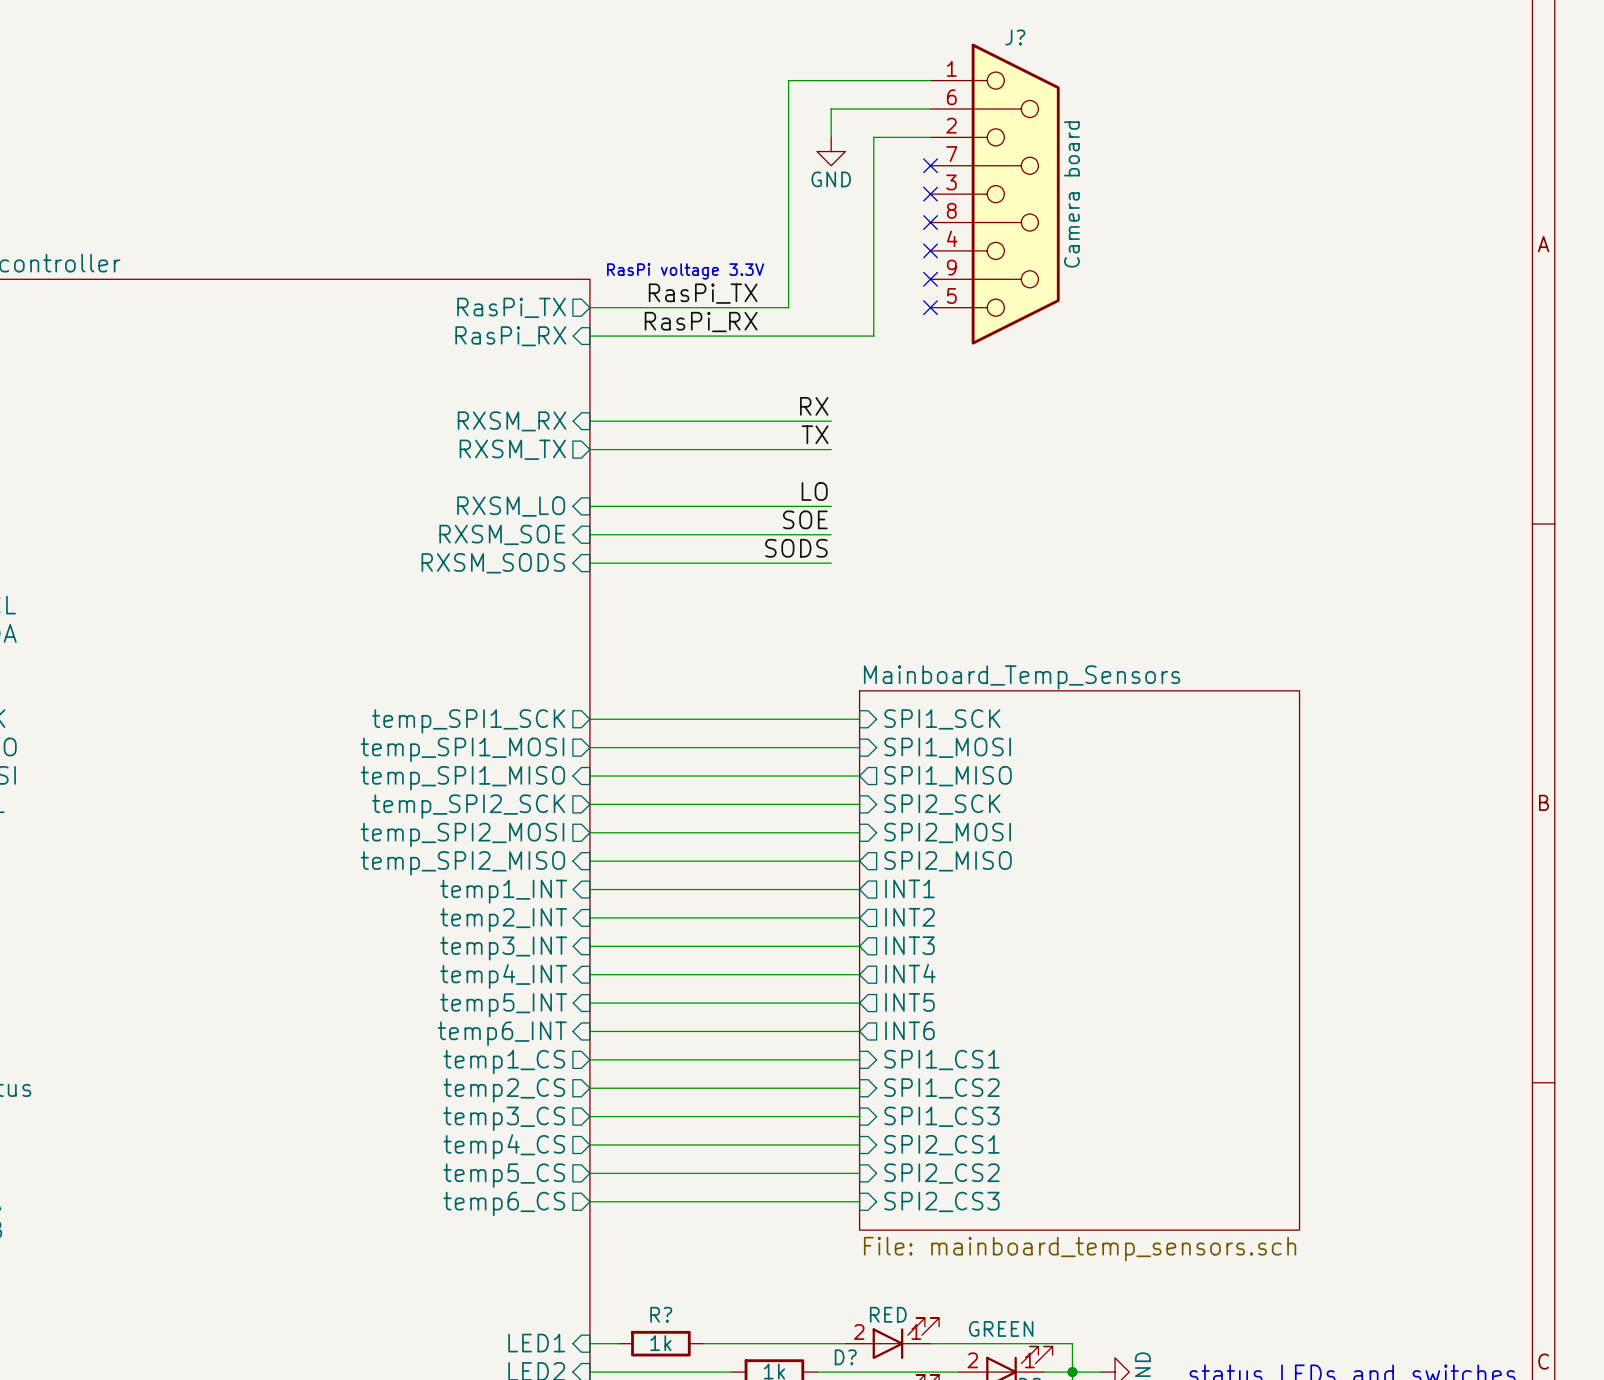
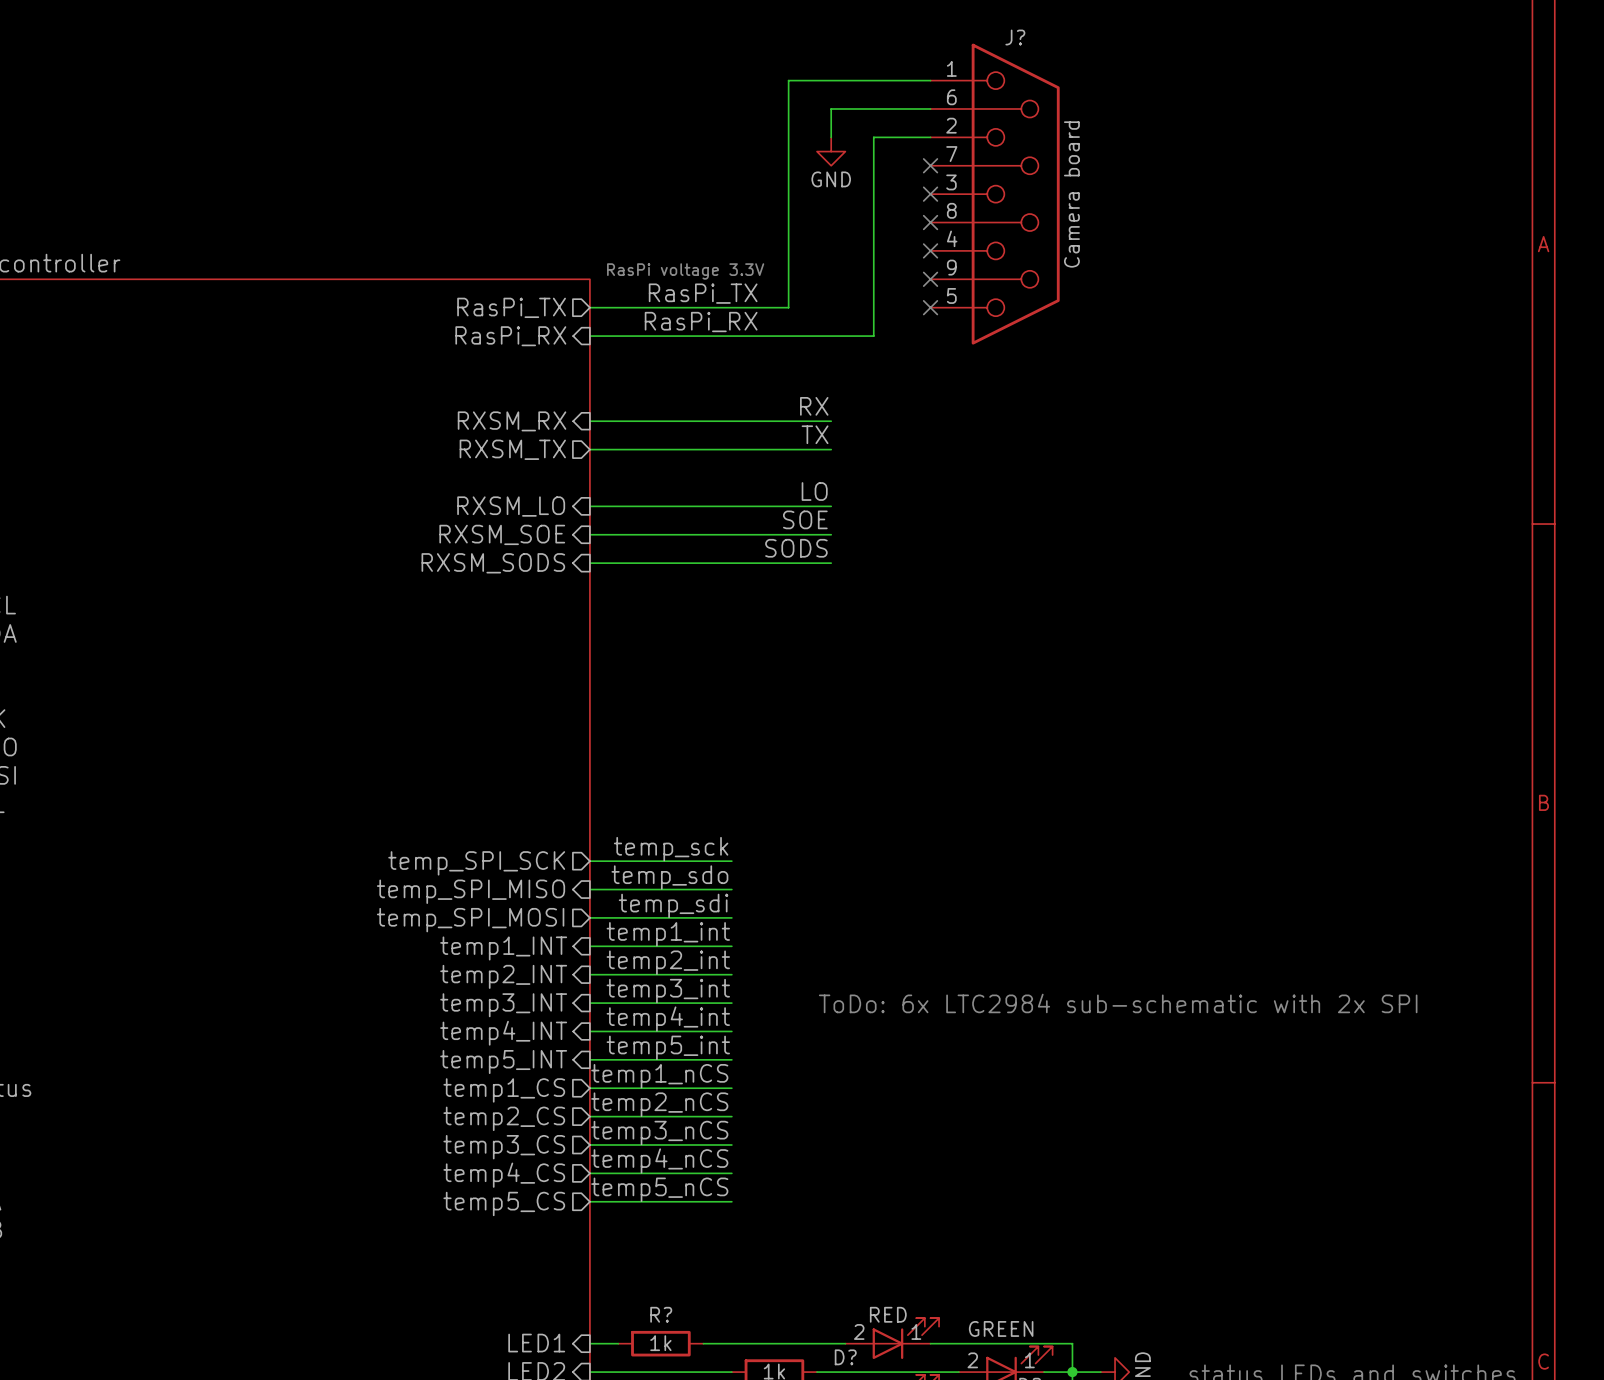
wire: (589, 719) (859, 719) -> none
sheet pin: SPI1_SCK (942, 719) -> none
sheet pin: temp_SPI1_SCK (468, 721) -> none
wire: (589, 747) (859, 747) -> none
sheet pin: SPI1_MOSI (947, 747) -> none
sheet pin: temp_SPI1_MOSI (462, 749) -> none
wire: (589, 776) (859, 776) -> none
sheet pin: SPI1_MISO (948, 776) -> none
sheet pin: temp_SPI1_MISO (462, 778) -> none
wire: (589, 804) (859, 804) -> none
sheet pin: SPI2_SCK (942, 804) -> none
sheet pin: temp_SPI2_SCK (468, 806) -> none
wire: (589, 832) (859, 832) -> none
sheet pin: SPI2_MOSI (947, 832) -> none
sheet pin: temp_SPI2_MOSI (462, 834) -> none
label: none -> temp_sck (671, 849)
wire: (731, 861) (859, 861) -> none
sheet pin: SPI2_MISO (948, 861) -> none
sheet pin shape: input (462, 863) -> output (476, 863)
sheet pin: temp_SPI2_MISO (462, 863) -> temp_SPI_SCK (476, 863)
label: none -> temp_sdo (669, 877)
sheet pin: INT1 (909, 888) -> none
wire: (731, 889) (859, 889) -> none
sheet pin: temp1_INT (503, 891) -> temp_SPI_MISO (471, 891)
label: none -> temp_sdi (673, 905)
wire: (731, 917) (859, 917) -> none
sheet pin: INT2 (909, 917) -> none
sheet pin shape: input (503, 920) -> output (470, 920)
sheet pin: temp2_INT (503, 920) -> temp_SPI_MOSI (470, 920)
label: none -> temp1_int (668, 934)
sheet pin: INT3 (909, 945) -> none
wire: (731, 946) (859, 946) -> none
sheet pin: temp3_INT (503, 948) -> temp1_INT (503, 948)
sheet Mainboard_Temp_Sensors: File: mainboard_temp_sensors.sch (1079, 960) -> none
label: none -> temp2_int (668, 962)
sheet pin: INT4 (910, 973) -> none
wire: (731, 974) (859, 974) -> none
sheet pin: temp4_INT (503, 976) -> temp2_INT (503, 976)
label: none -> temp3_int (668, 991)
sheet pin: INT5 (909, 1002) -> none
wire: (731, 1003) (859, 1003) -> none
text: none -> ToDo: 6x LTC2984 sub-schematic with 2x SPI (1118, 1003)
sheet pin: temp5_INT (503, 1005) -> temp3_INT (503, 1005)
label: none -> temp4_int (668, 1019)
sheet pin: INT6 (909, 1030) -> none
wire: (731, 1031) (859, 1031) -> none
sheet pin: temp6_INT (502, 1033) -> temp4_INT (503, 1033)
label: none -> temp5_int (668, 1047)
wire: (731, 1059) (859, 1059) -> none
sheet pin: SPI1_CS1 (942, 1060) -> none
sheet pin shape: output (504, 1062) -> input (503, 1062)
sheet pin: temp1_CS (504, 1062) -> temp5_INT (503, 1062)
label: none -> temp1_nCS (659, 1076)
wire: (731, 1088) (859, 1088) -> none
sheet pin: SPI1_CS2 (942, 1088) -> none
sheet pin: temp2_CS (504, 1090) -> temp1_CS (504, 1090)
label: none -> temp2_nCS (659, 1104)
wire: (731, 1116) (859, 1116) -> none
sheet pin: SPI1_CS3 (942, 1116) -> none
sheet pin: temp3_CS (504, 1118) -> temp2_CS (504, 1118)
label: none -> temp3_nCS (659, 1132)
wire: (731, 1145) (859, 1145) -> none
sheet pin: SPI2_CS1 (942, 1145) -> none
sheet pin: temp4_CS (504, 1146) -> temp3_CS (504, 1147)
label: none -> temp4_nCS (659, 1160)
wire: (731, 1173) (859, 1173) -> none
sheet pin: SPI2_CS2 (942, 1173) -> none
sheet pin: temp5_CS (504, 1175) -> temp4_CS (504, 1175)
label: none -> temp5_nCS (659, 1189)
wire: (731, 1201) (859, 1201) -> none
sheet pin: SPI2_CS3 (942, 1201) -> none
sheet pin: temp6_CS (504, 1203) -> temp5_CS (504, 1203)

